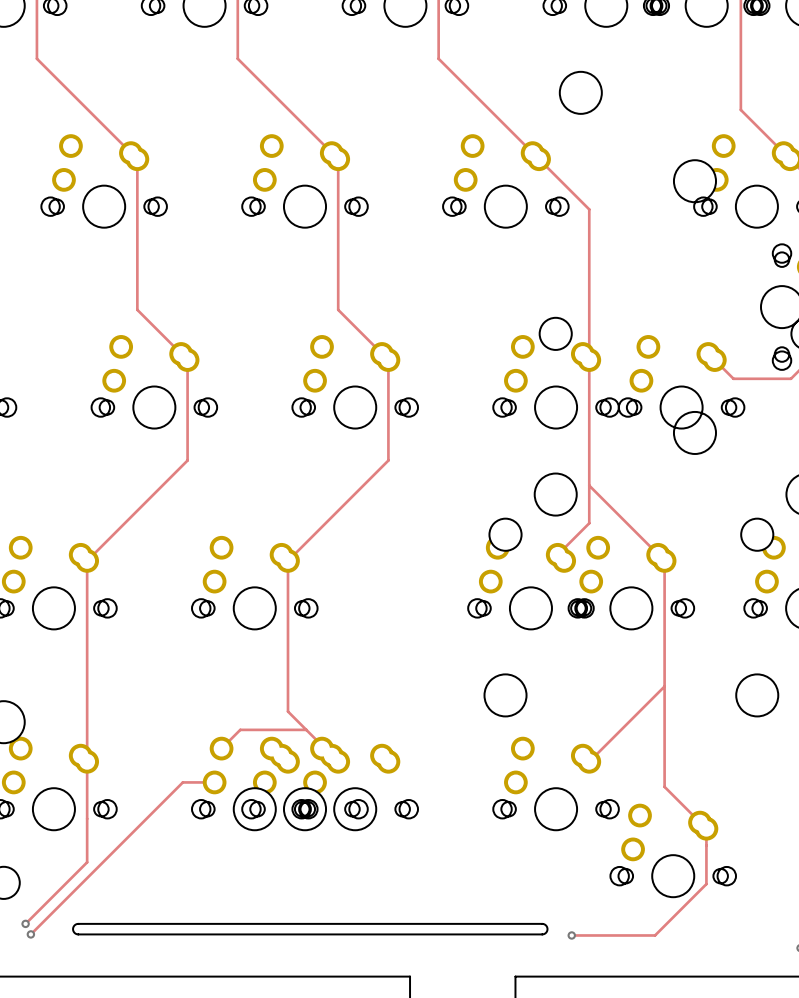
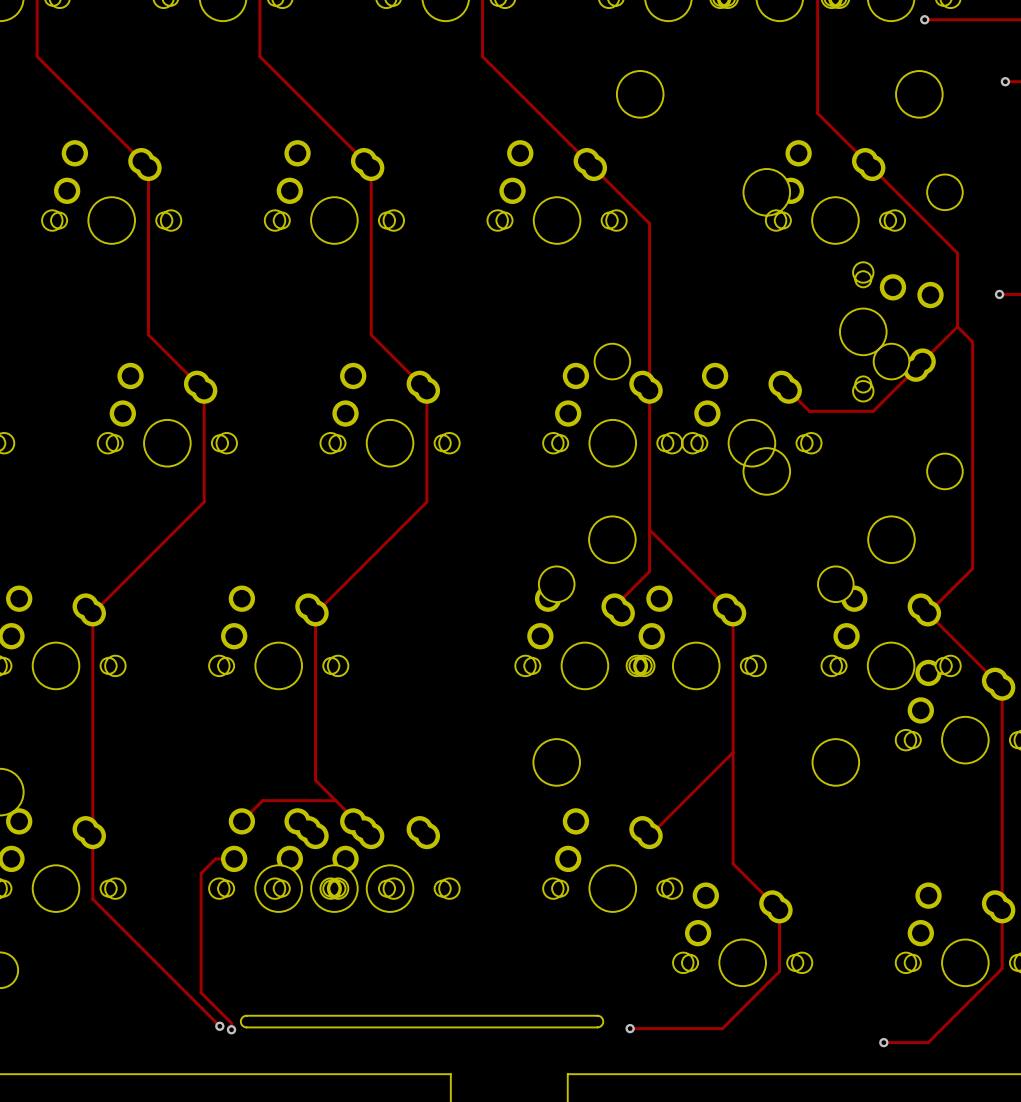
track: (197, 782) (182, 782) (30, 934) -> (215, 858) (201, 873) (201, 992) (231, 1023) (231, 1029)
track: (87, 818) (87, 862) (25, 923) -> (92, 899) (219, 1026)
via: (25, 923) -> none
board edge: (225, 923) (78, 923) (74, 925) (73, 929) (74, 932) (78, 934) (225, 934) -> (246, 1015) (242, 1017) (240, 1021) (242, 1025) (246, 1027)
via: none -> (219, 1026)
via: (30, 934) -> none
via: none -> (231, 1029)

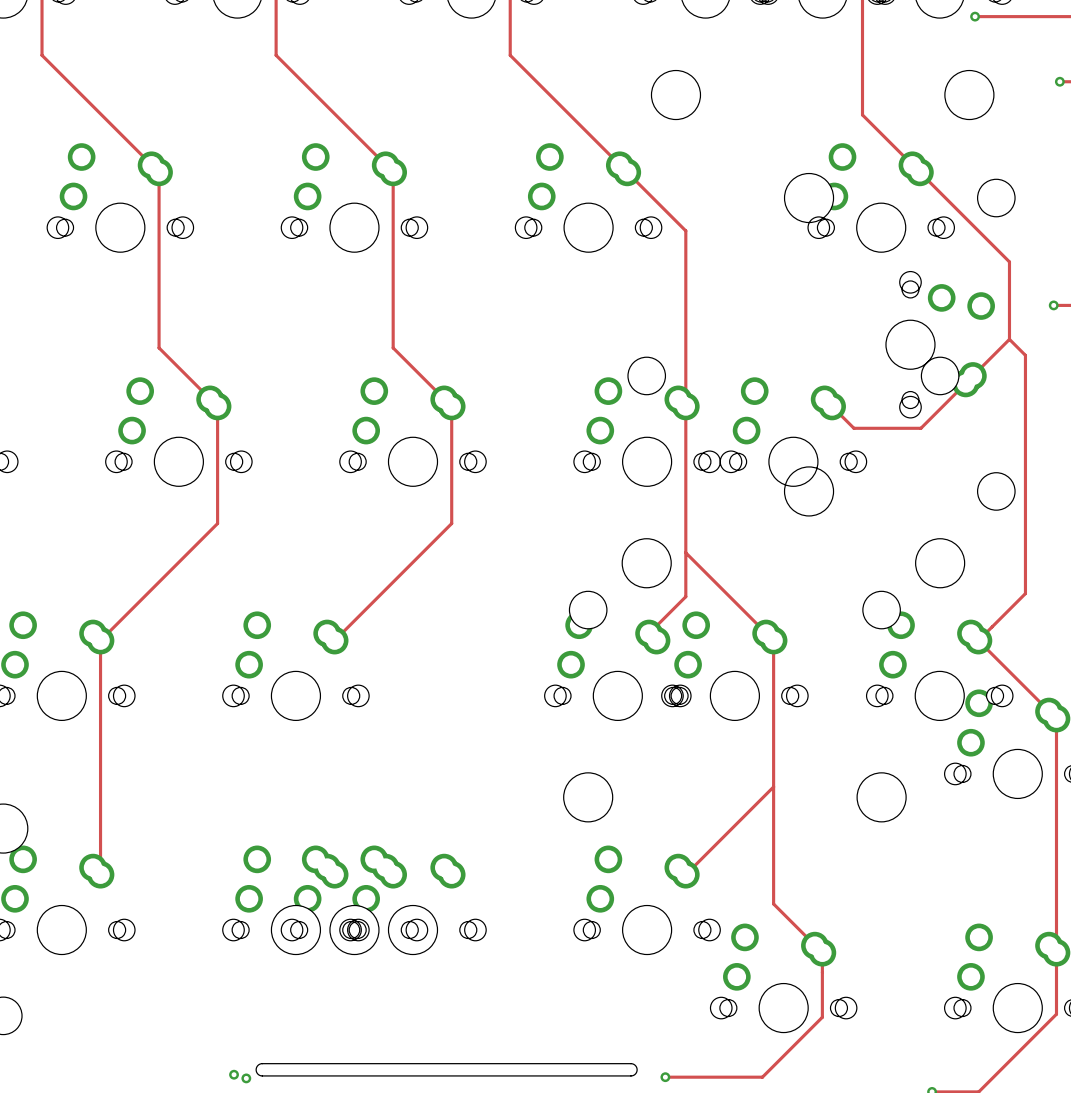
track: (315, 613) (315, 780) (371, 836) -> none
track: (335, 800) (262, 800) (241, 821) -> none
track: (92, 836) (92, 899) (219, 1026) -> none
track: (234, 858) (215, 858) (201, 873) (201, 992) (231, 1023) (231, 1029) -> none

